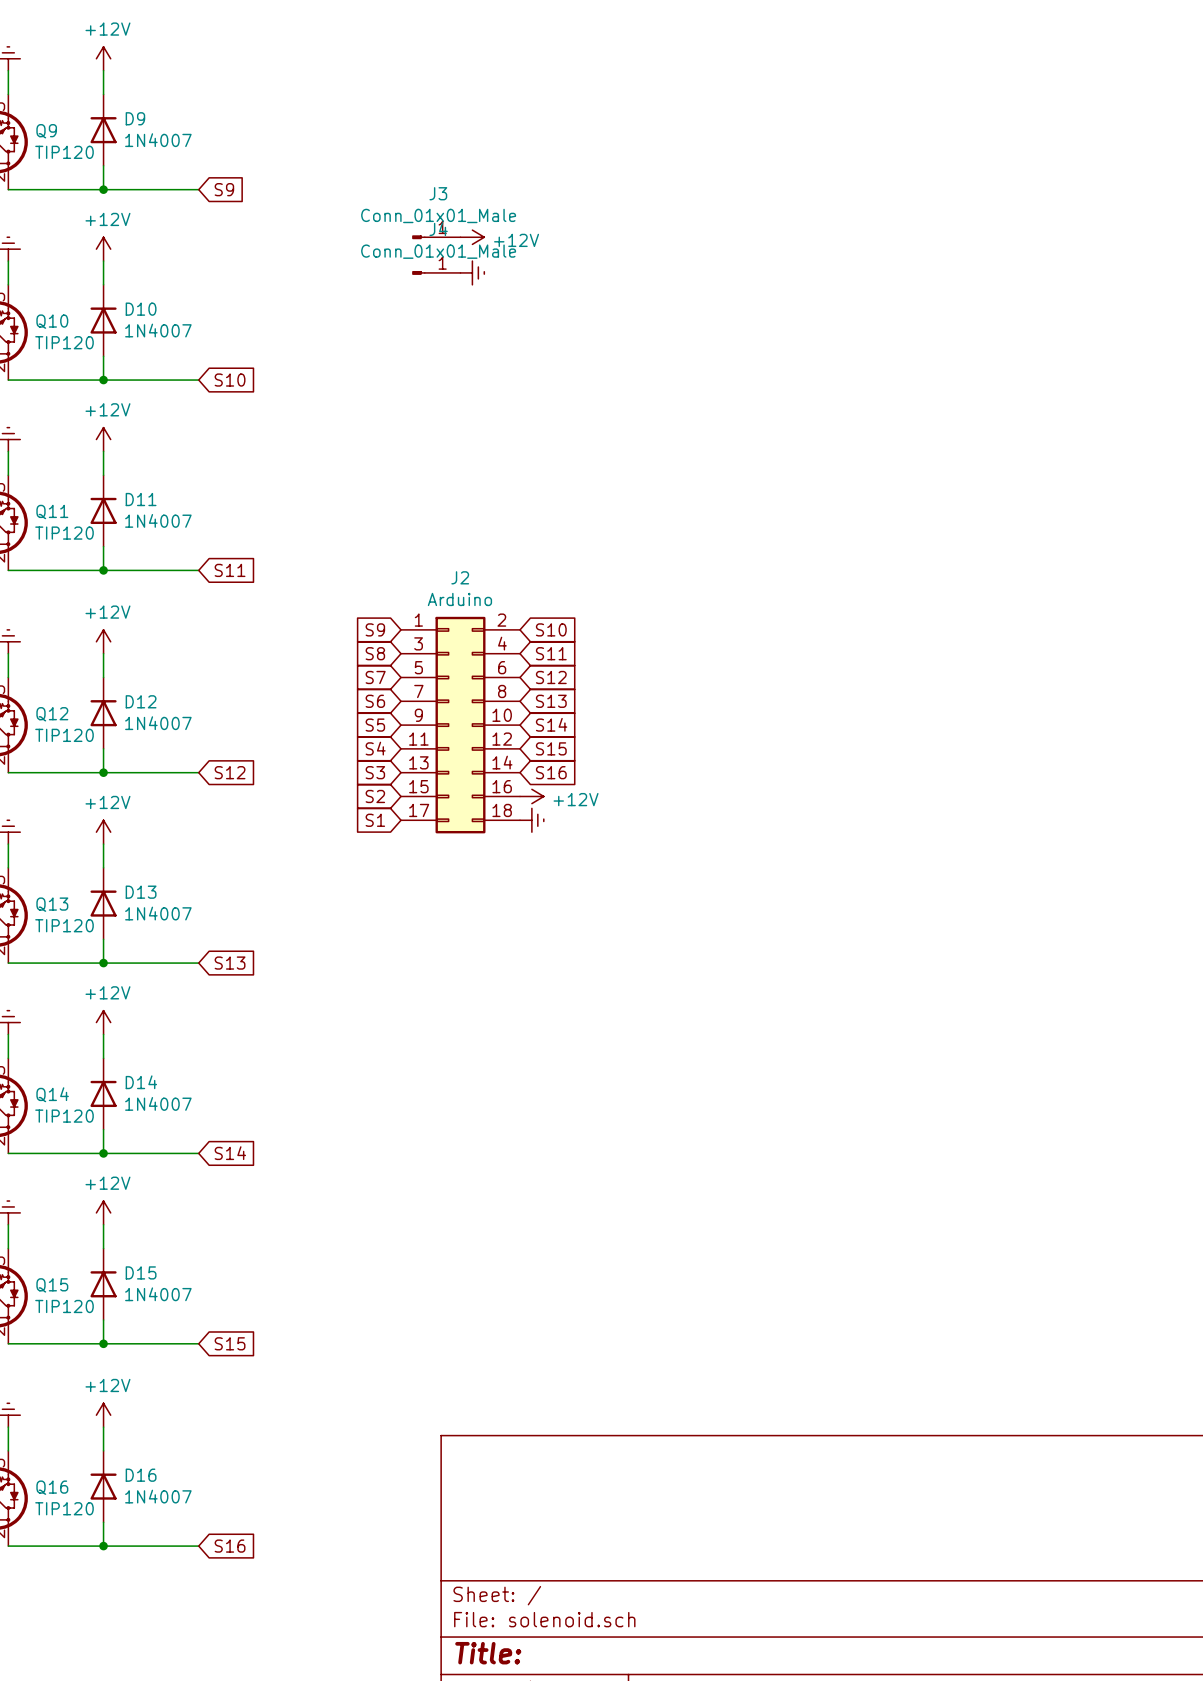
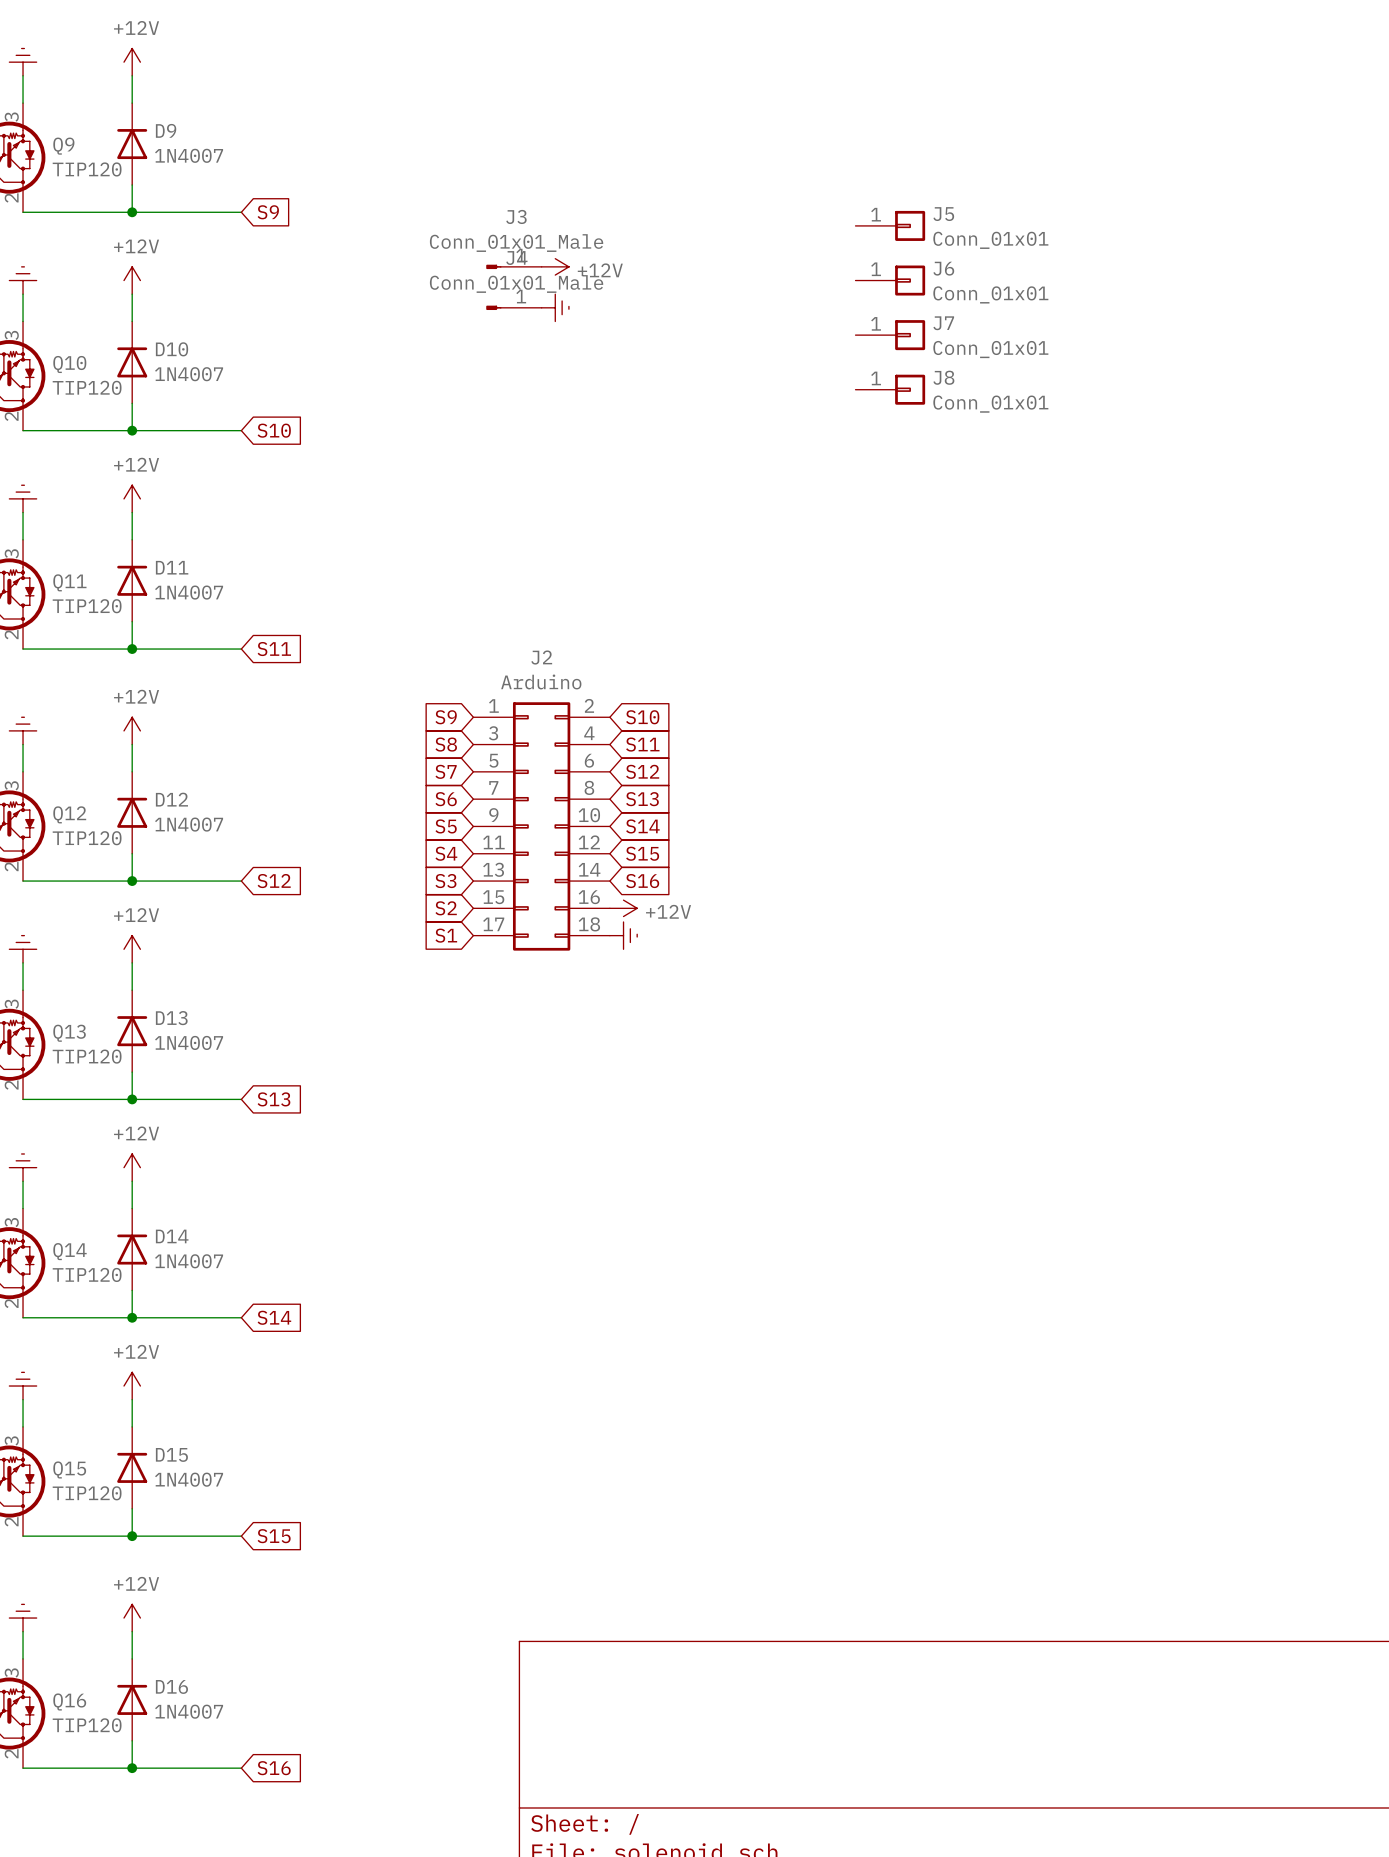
J5: none -> Conn_01x01 (890, 225)
J6: none -> Conn_01x01 (890, 280)
J7: none -> Conn_01x01 (890, 335)
J8: none -> Conn_01x01 (890, 389)

